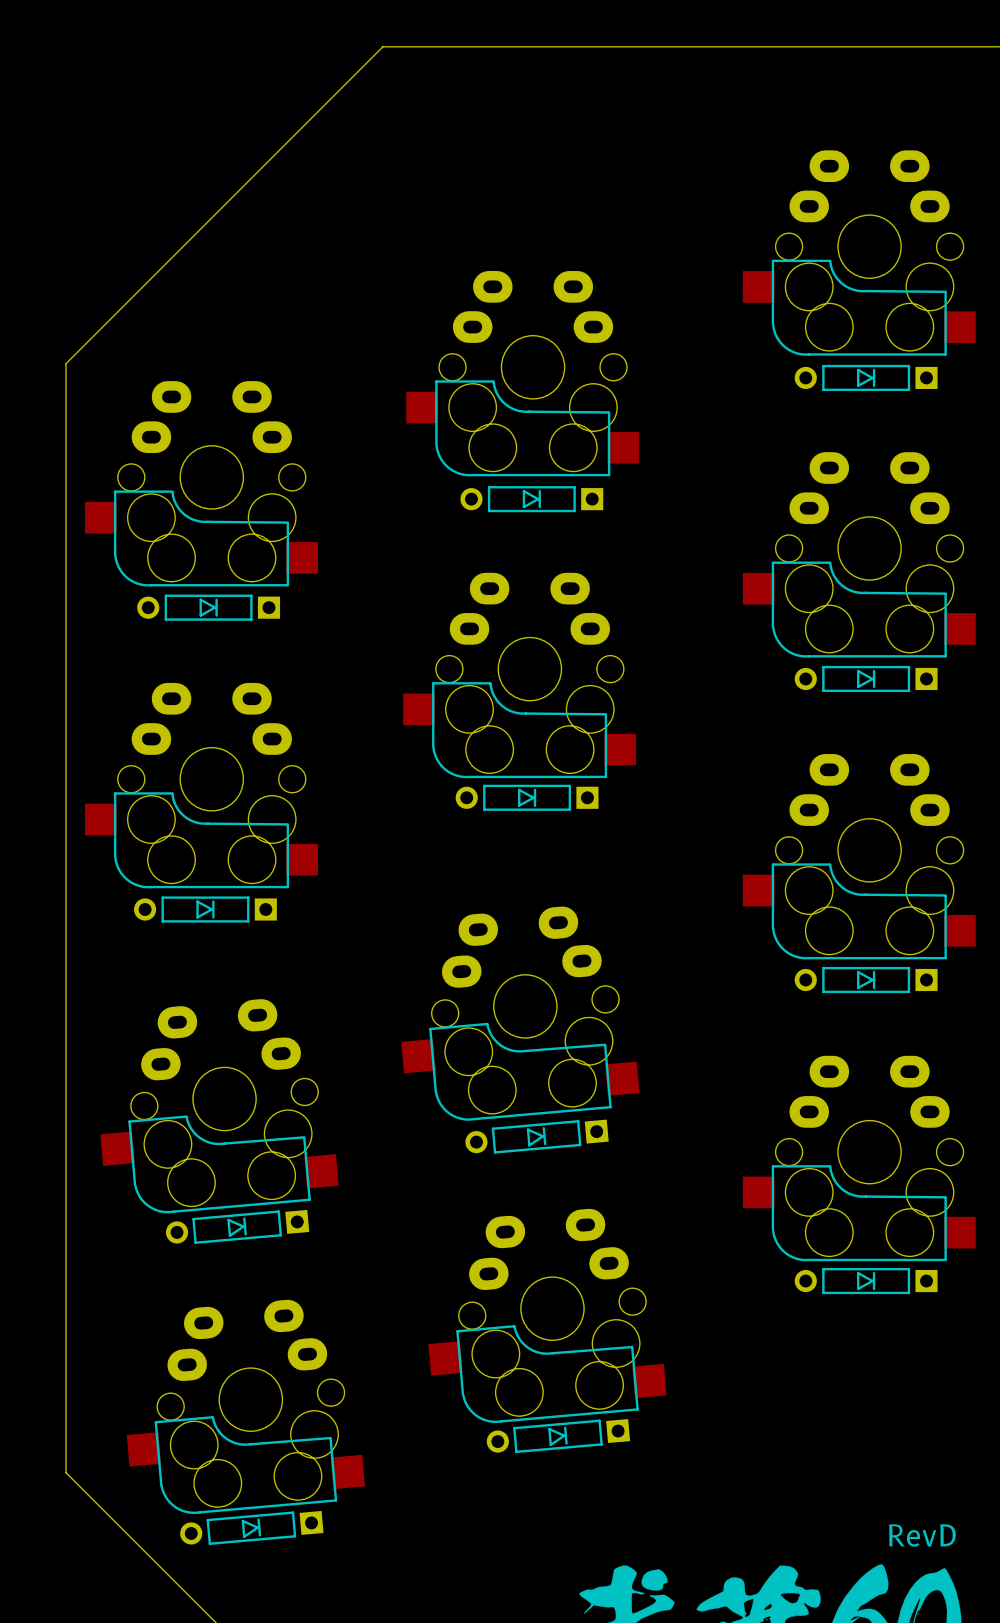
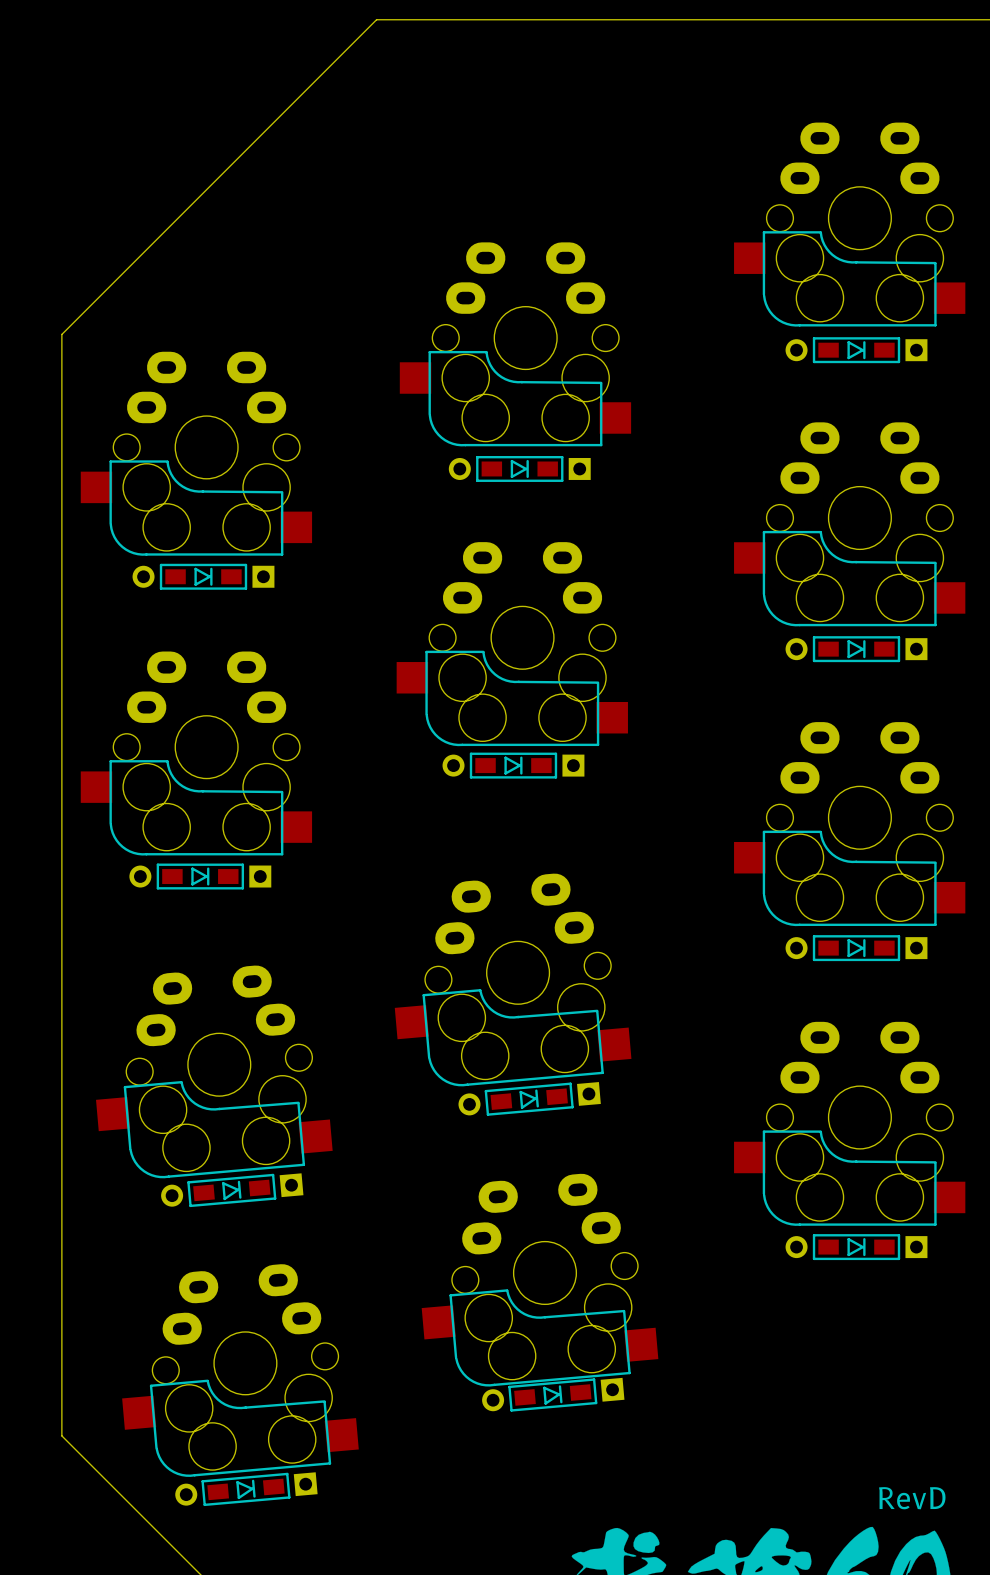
part footprint: [794, 364, 938, 392] -> [785, 337, 928, 364]
part footprint: [460, 486, 604, 513] -> [448, 456, 591, 482]
part footprint: [137, 594, 281, 621] -> [132, 563, 275, 590]
part footprint: [794, 665, 938, 693] -> [785, 636, 928, 663]
part footprint: [455, 784, 599, 811] -> [442, 752, 585, 779]
part footprint: [134, 896, 277, 923] -> [129, 863, 272, 890]
part footprint: [794, 966, 938, 994] -> [785, 935, 928, 962]
part footprint: [465, 1119, 609, 1154] -> [458, 1082, 601, 1116]
part footprint: [165, 1209, 310, 1244] -> [161, 1173, 304, 1208]
part footprint: [794, 1267, 938, 1295] -> [785, 1234, 928, 1261]
part footprint: [486, 1419, 631, 1454] -> [482, 1377, 625, 1412]
part footprint: [180, 1510, 324, 1545] -> [175, 1472, 318, 1507]

